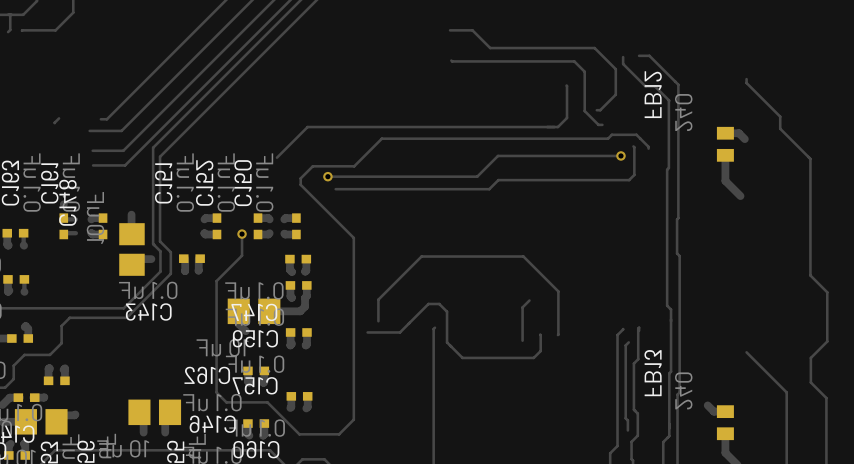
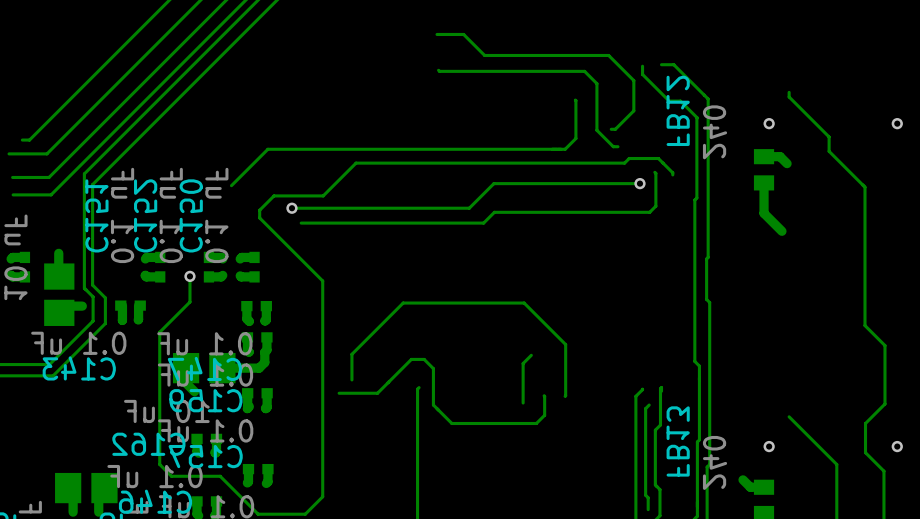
via: none -> (769, 123)
via: none -> (897, 123)
via: none -> (769, 446)
via: none -> (897, 446)

